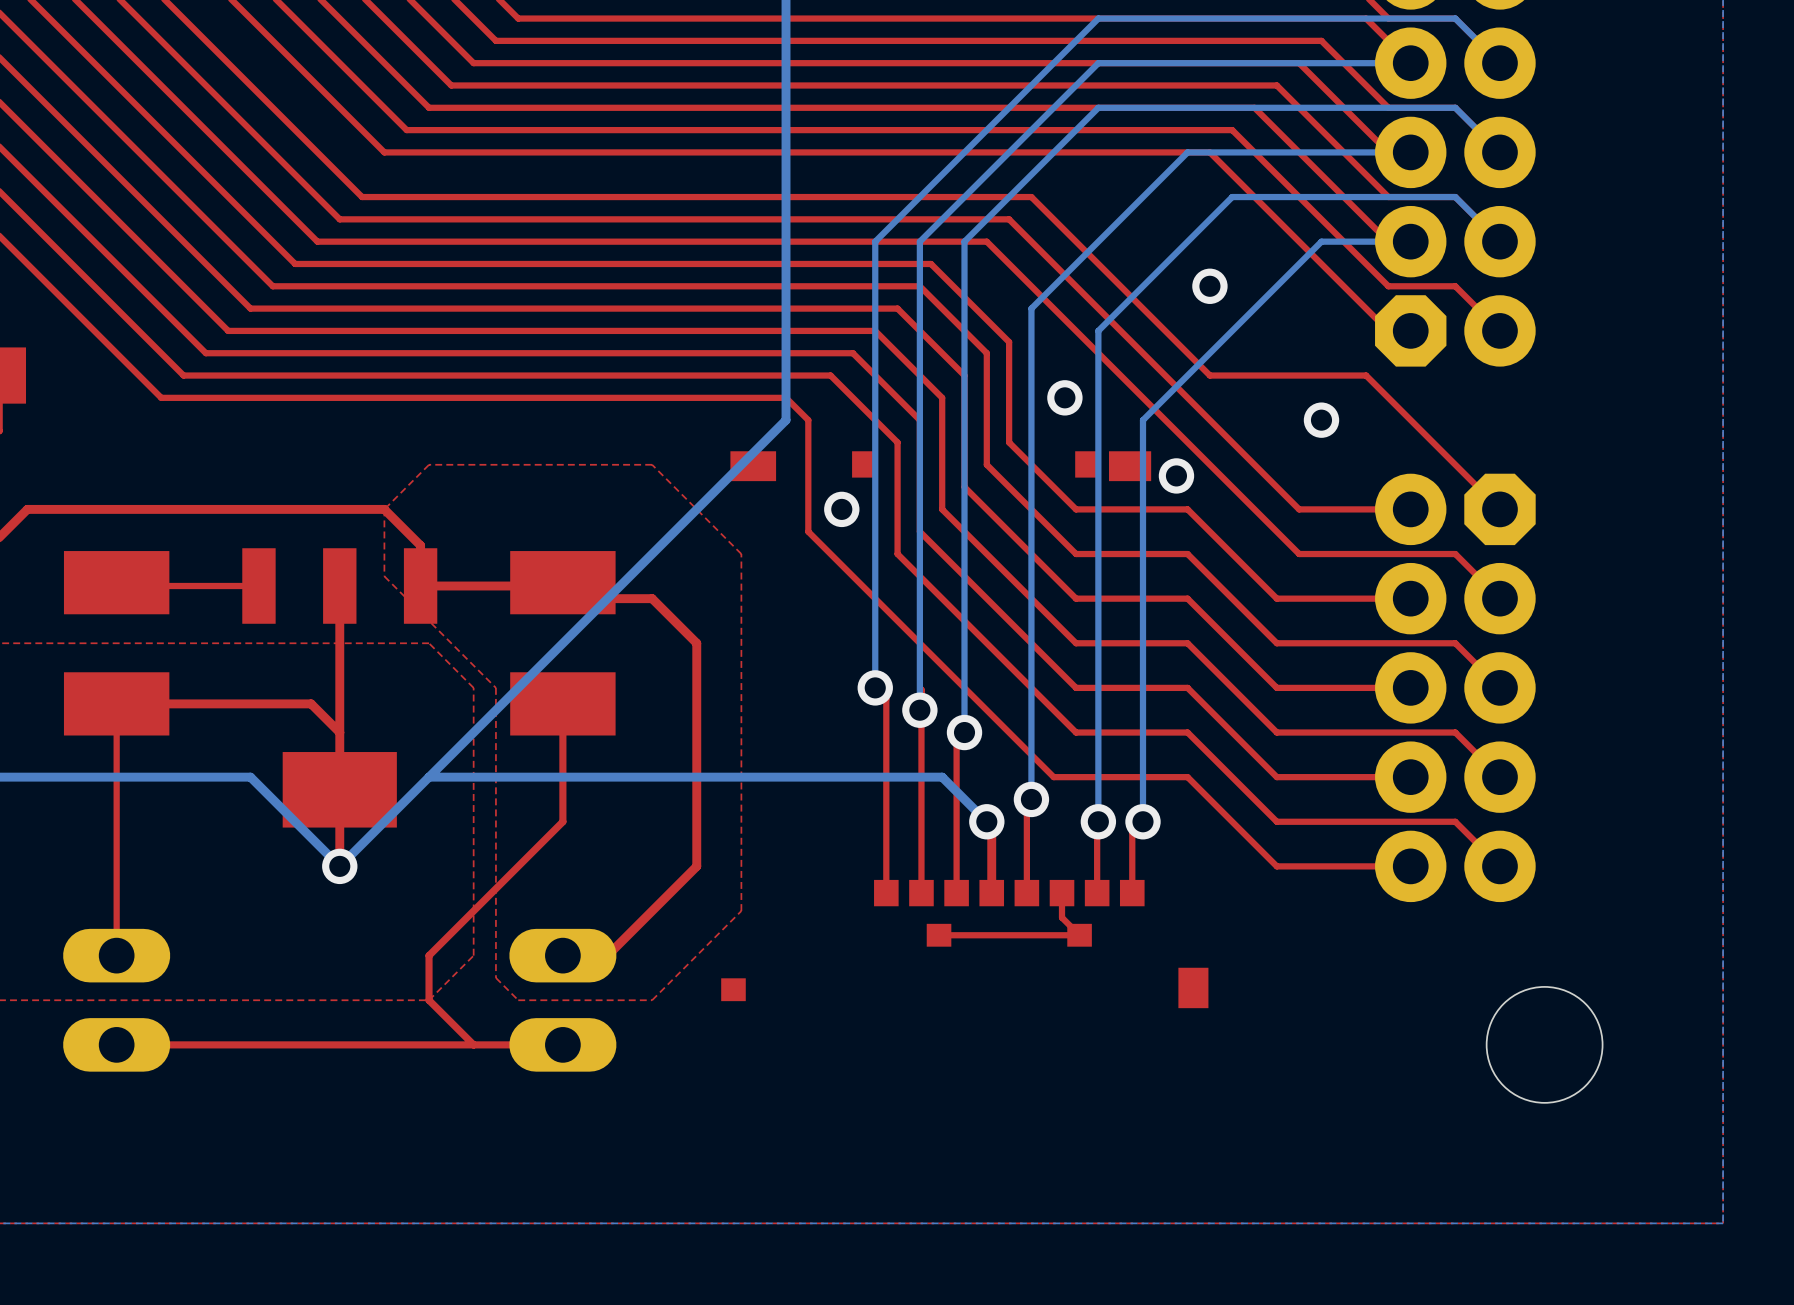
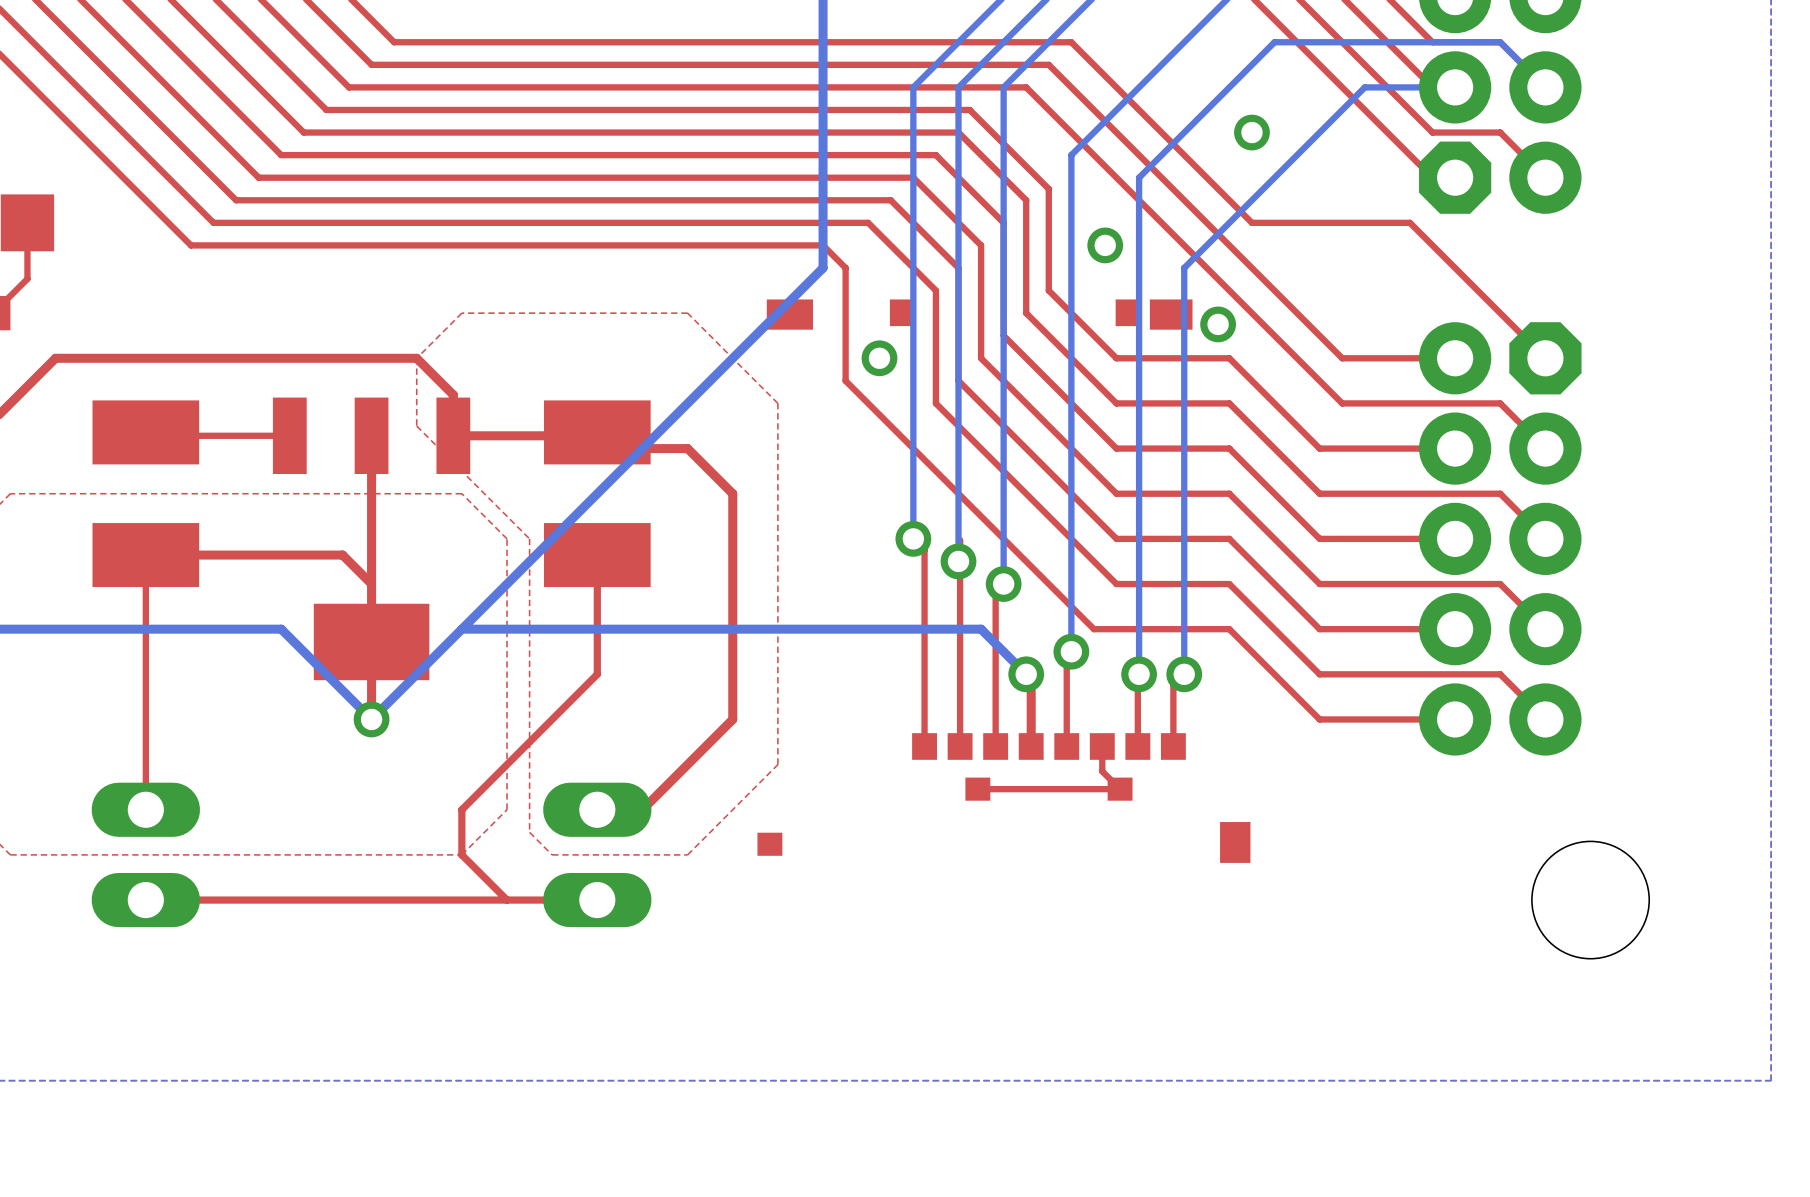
via: (1321, 420) -> none

